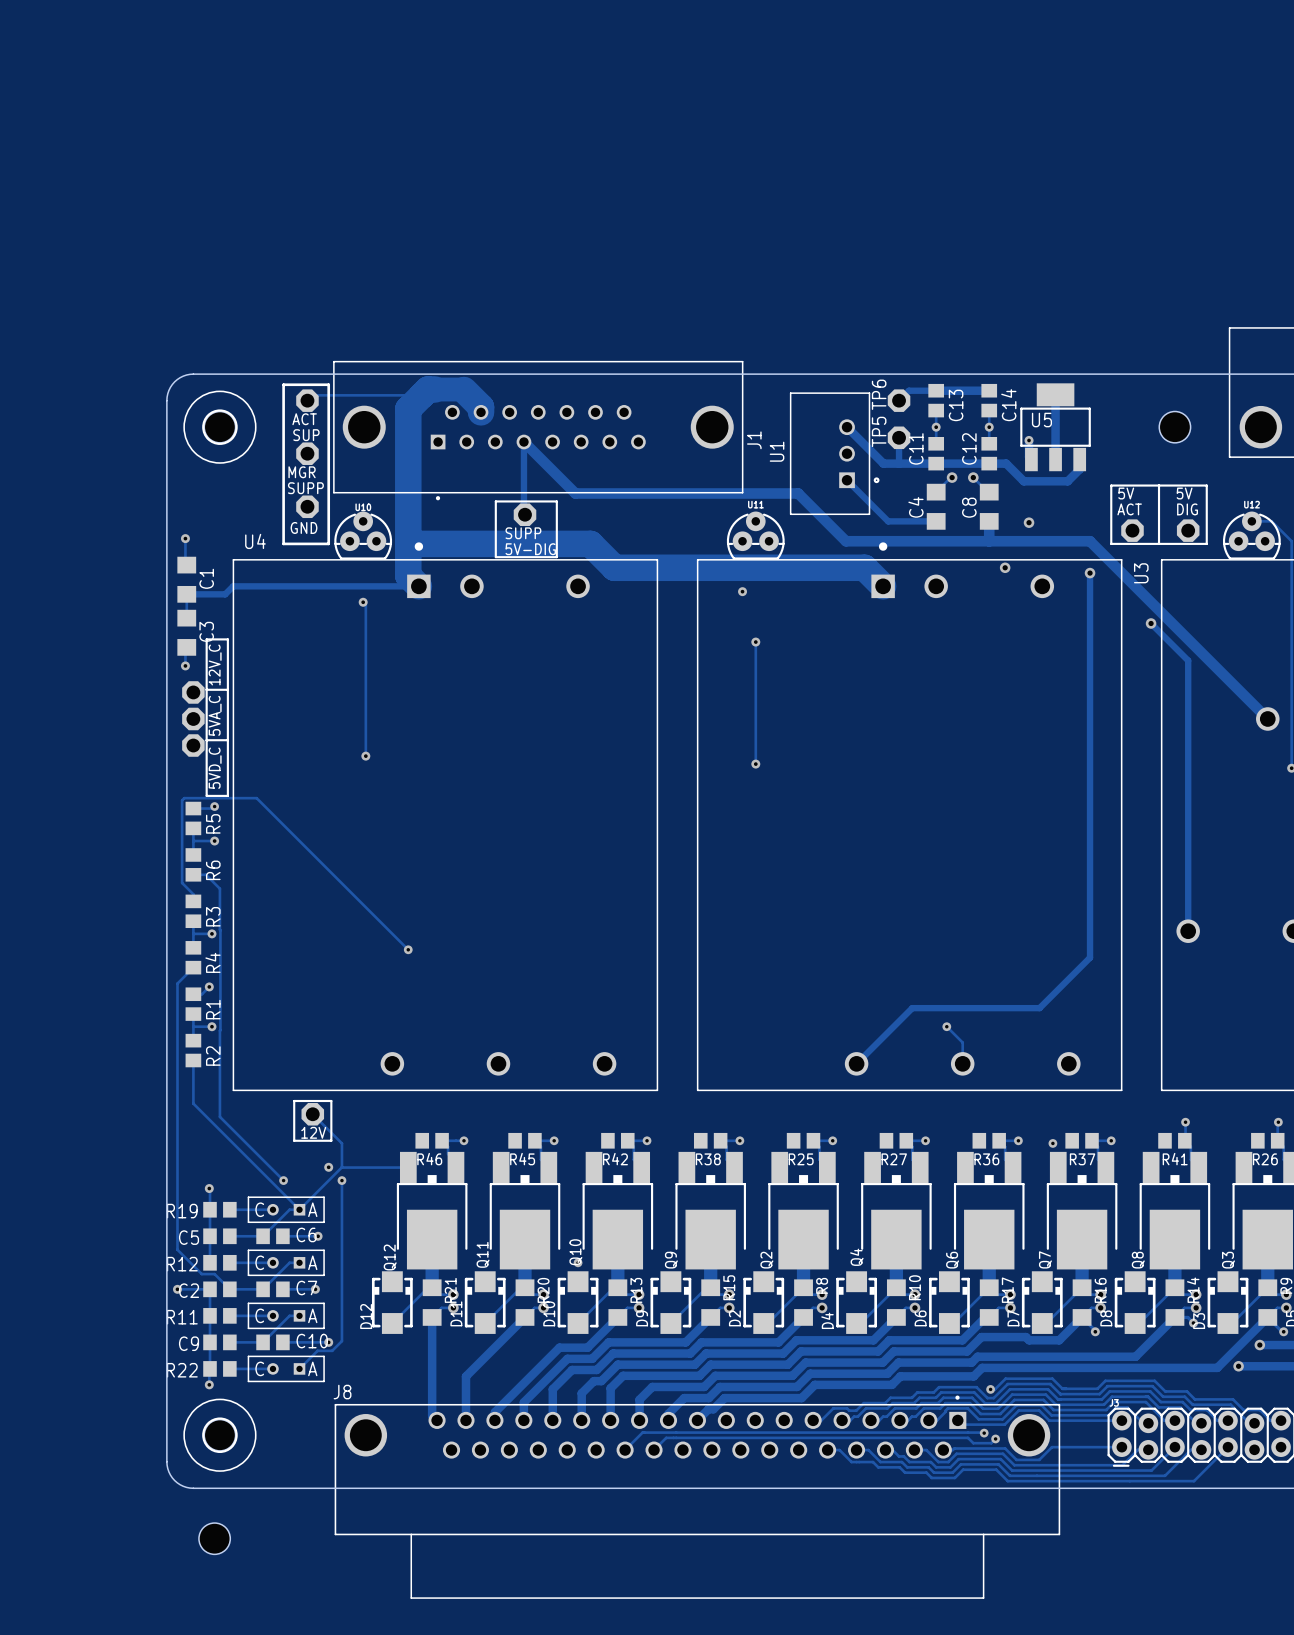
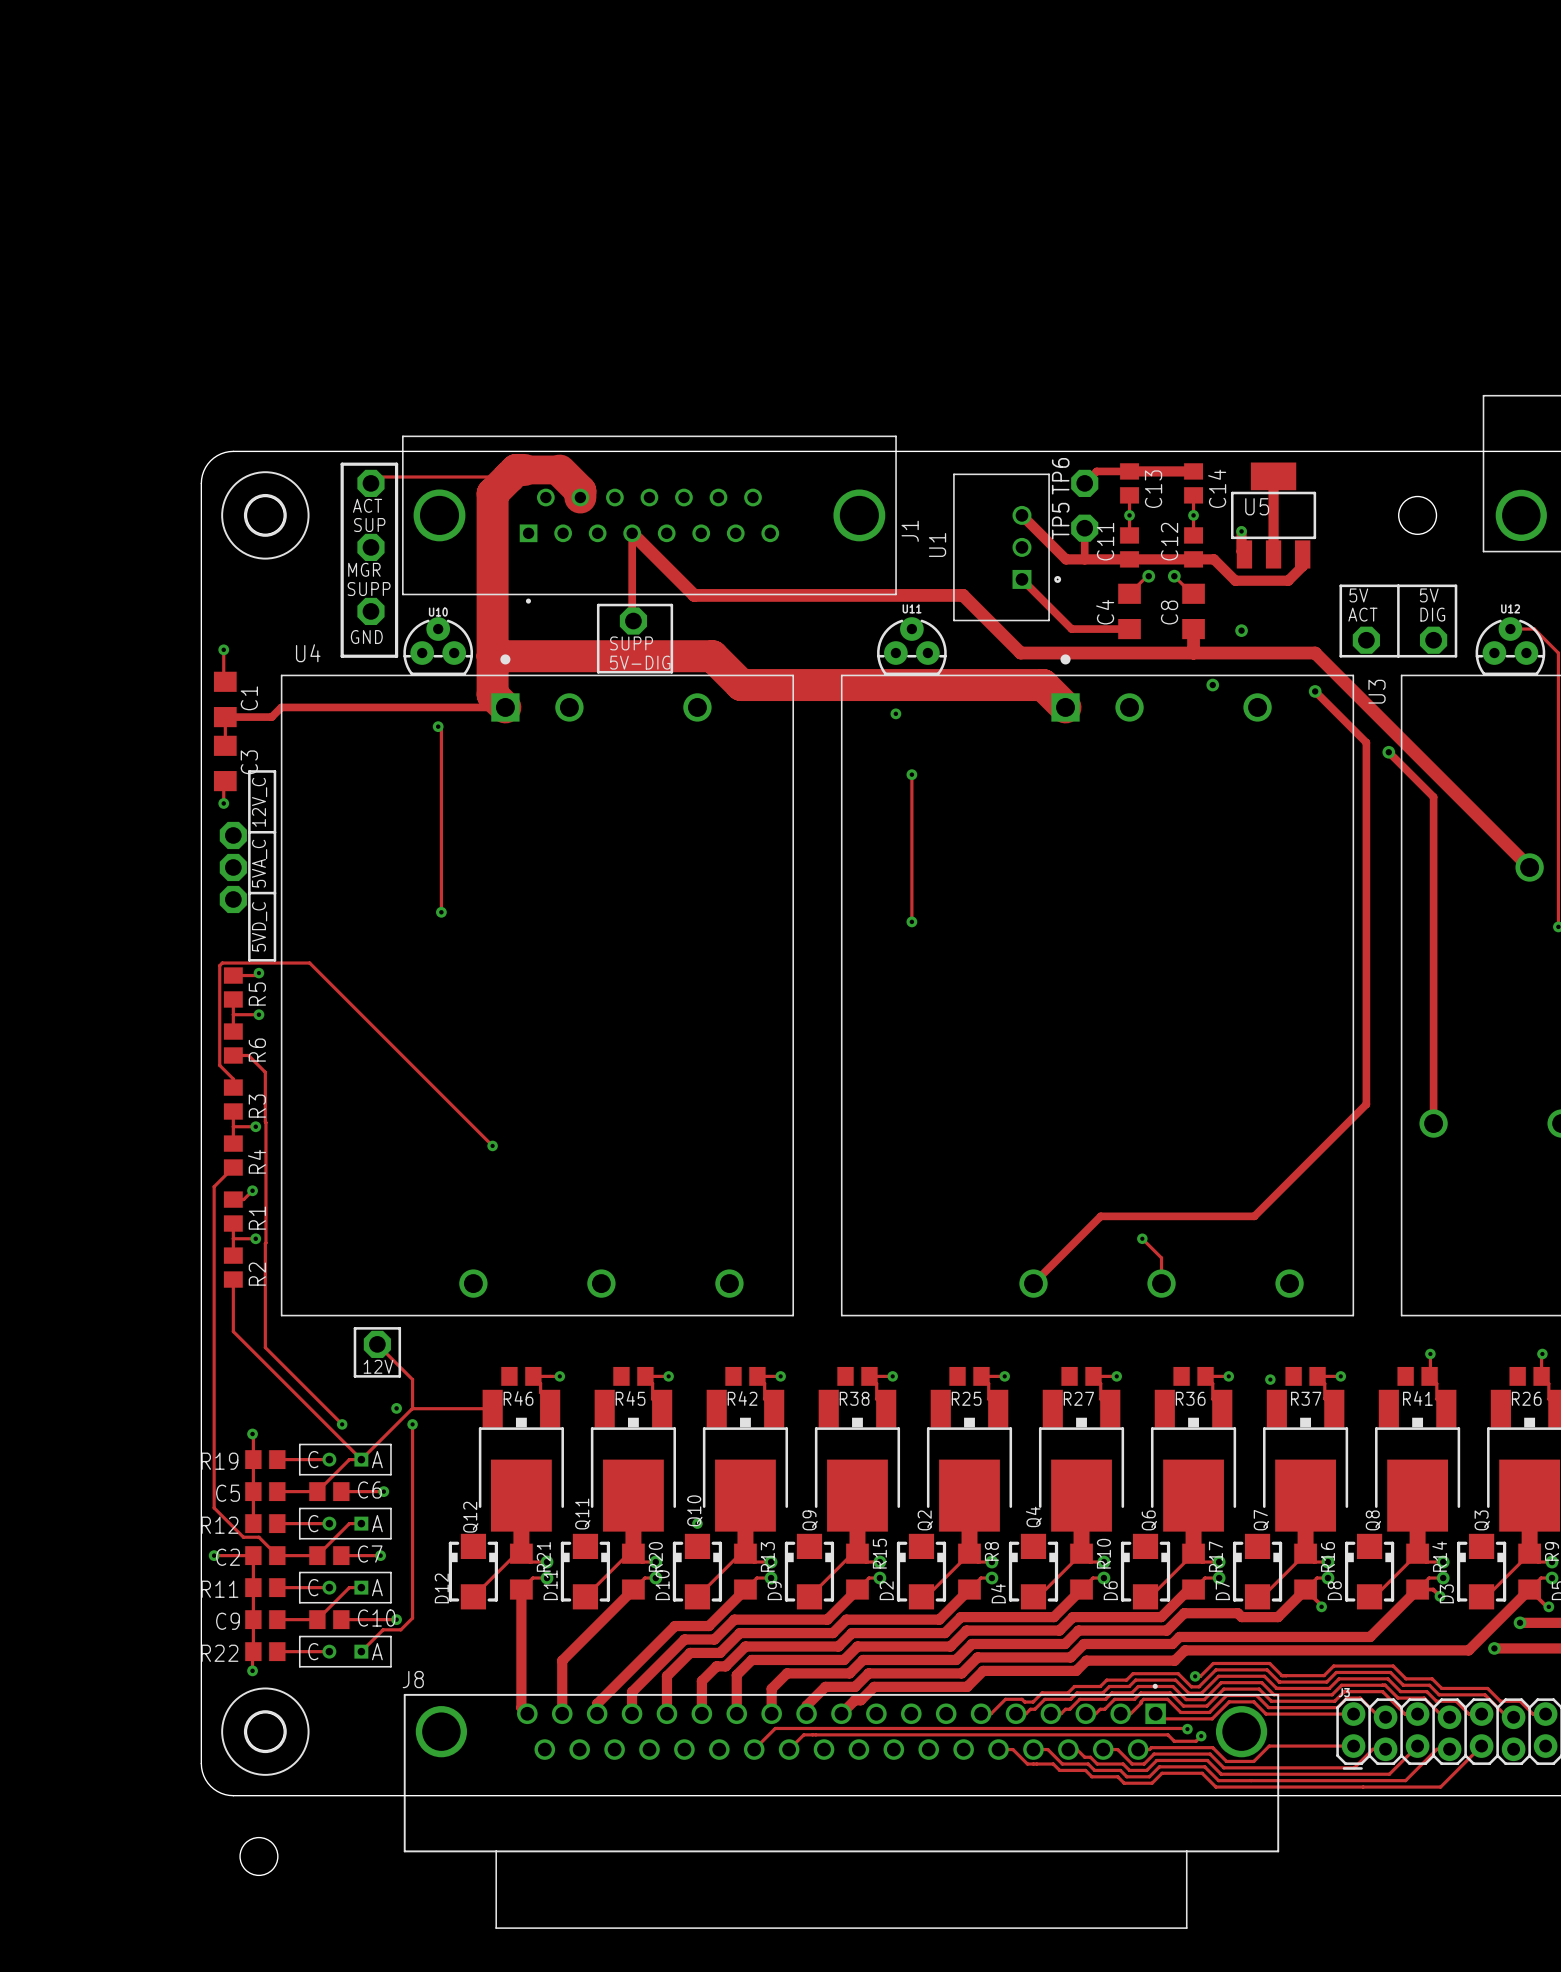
track: (1090, 573) (1090, 957) -> (1315, 691) (1366, 742) (1366, 1104) (1315, 1155)

